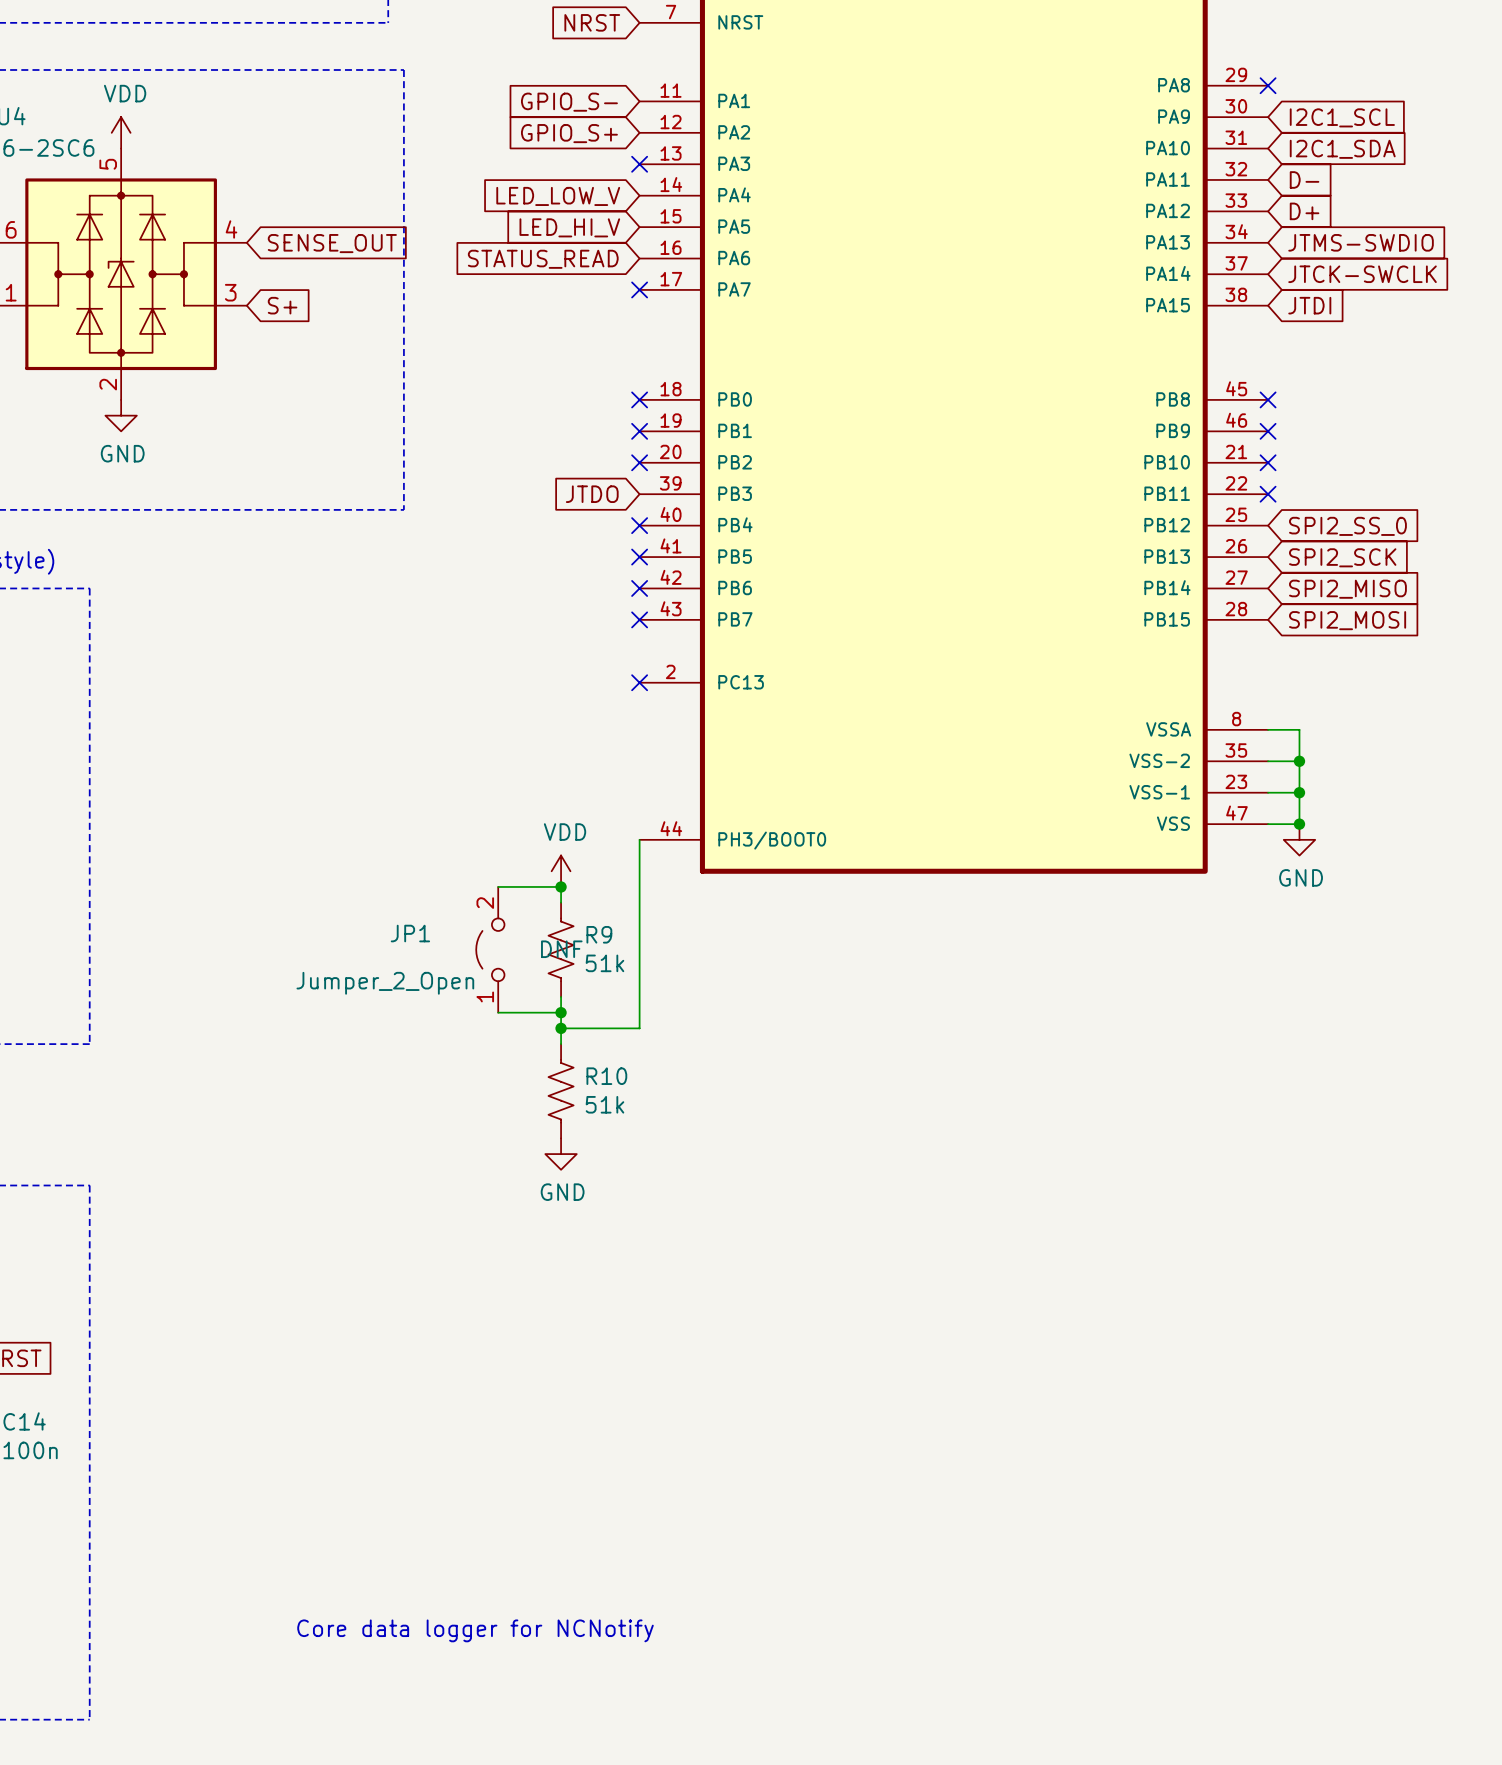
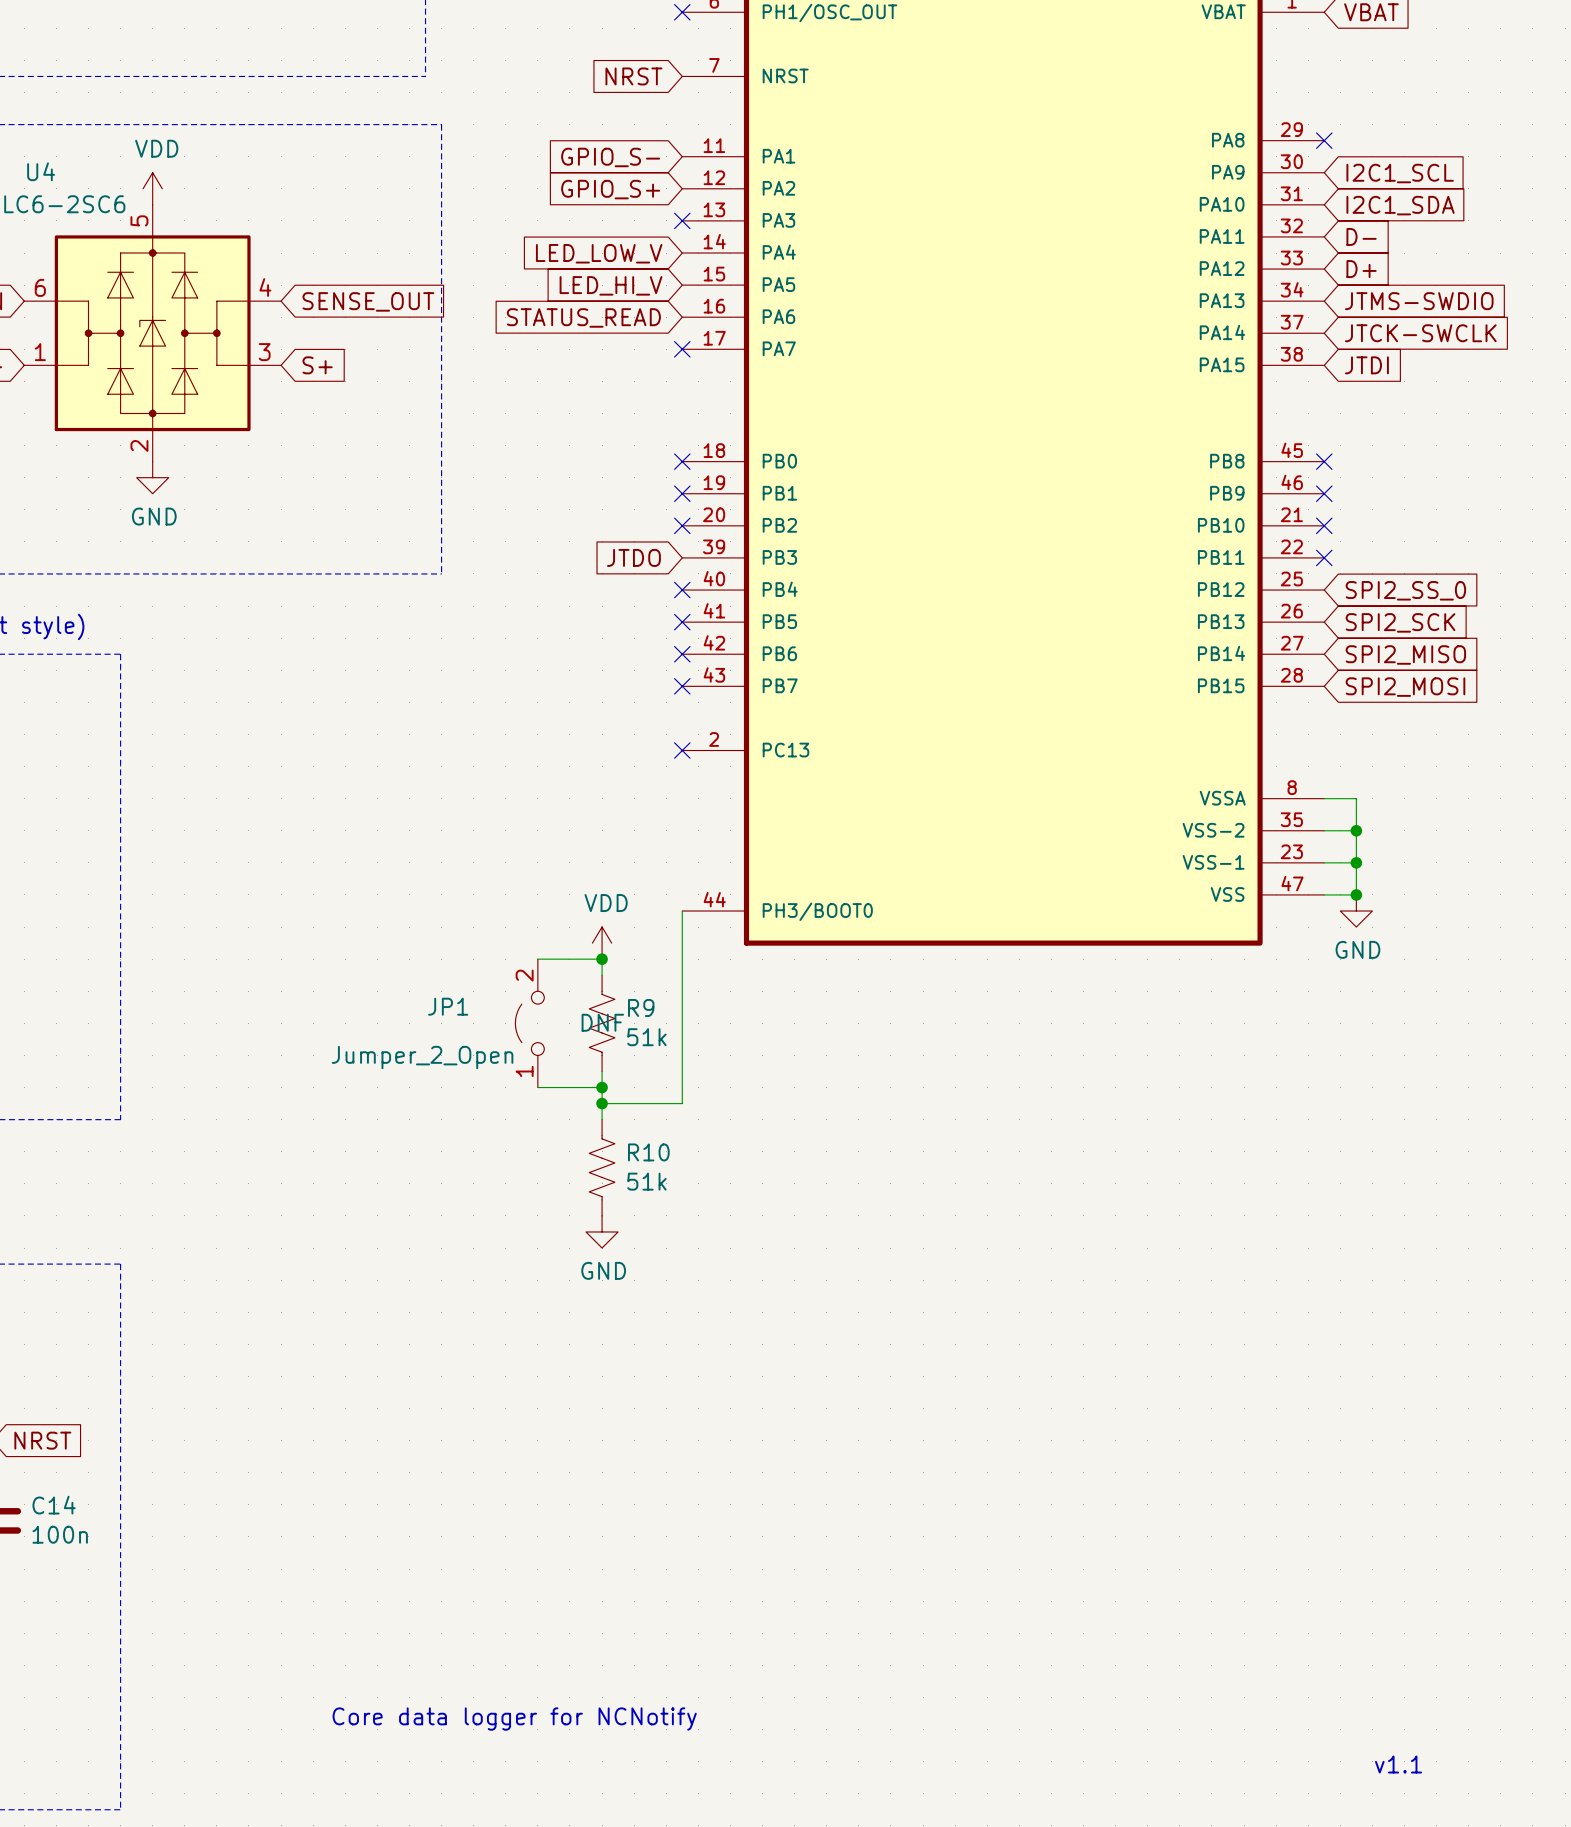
text: none -> v1.1 (1398, 1764)

